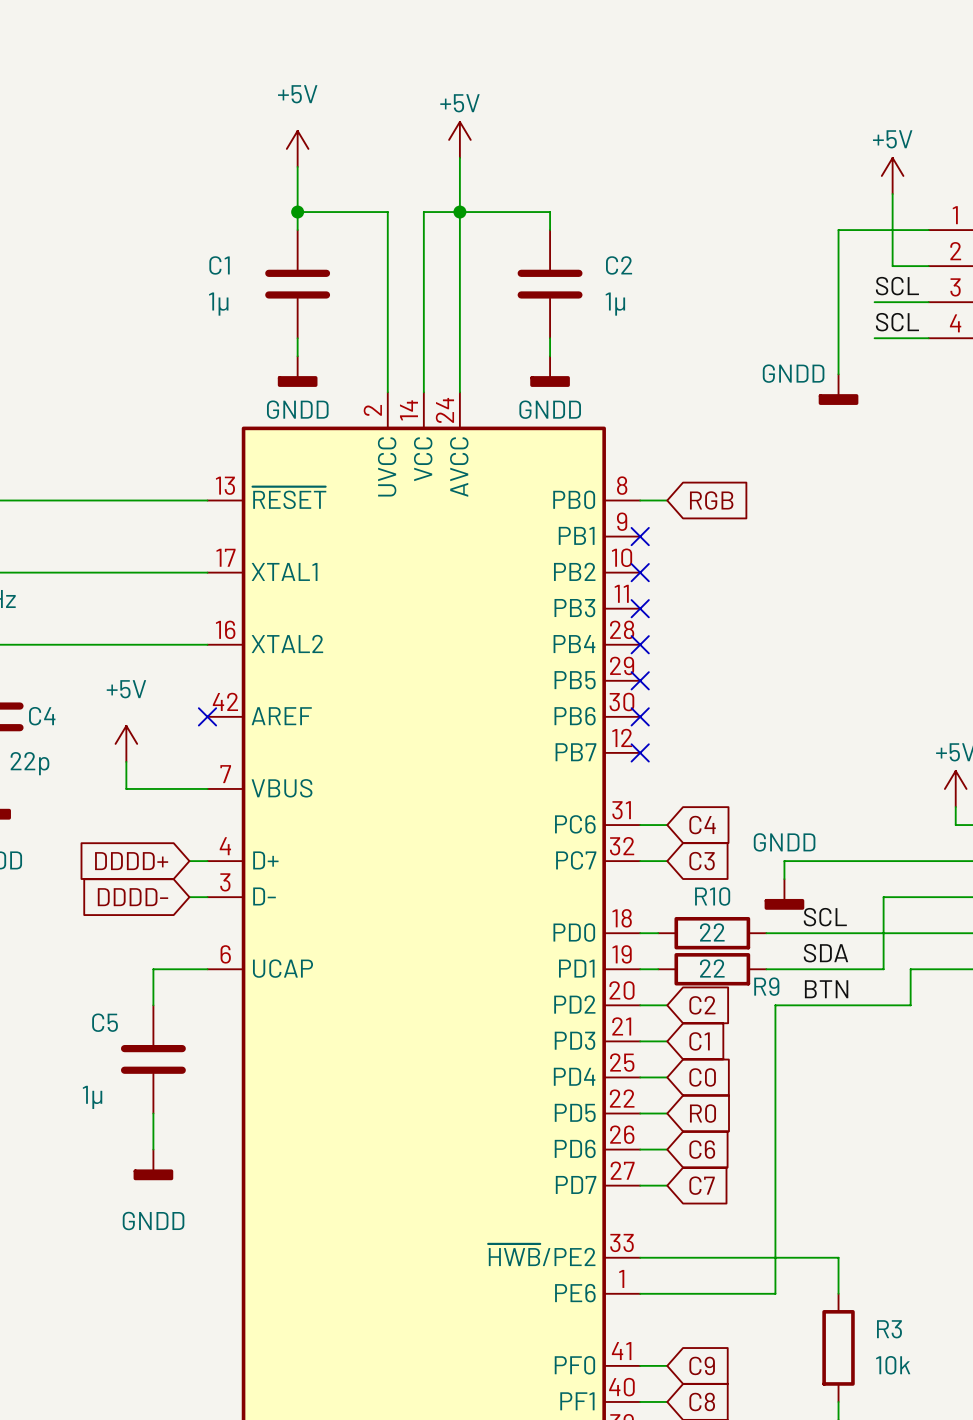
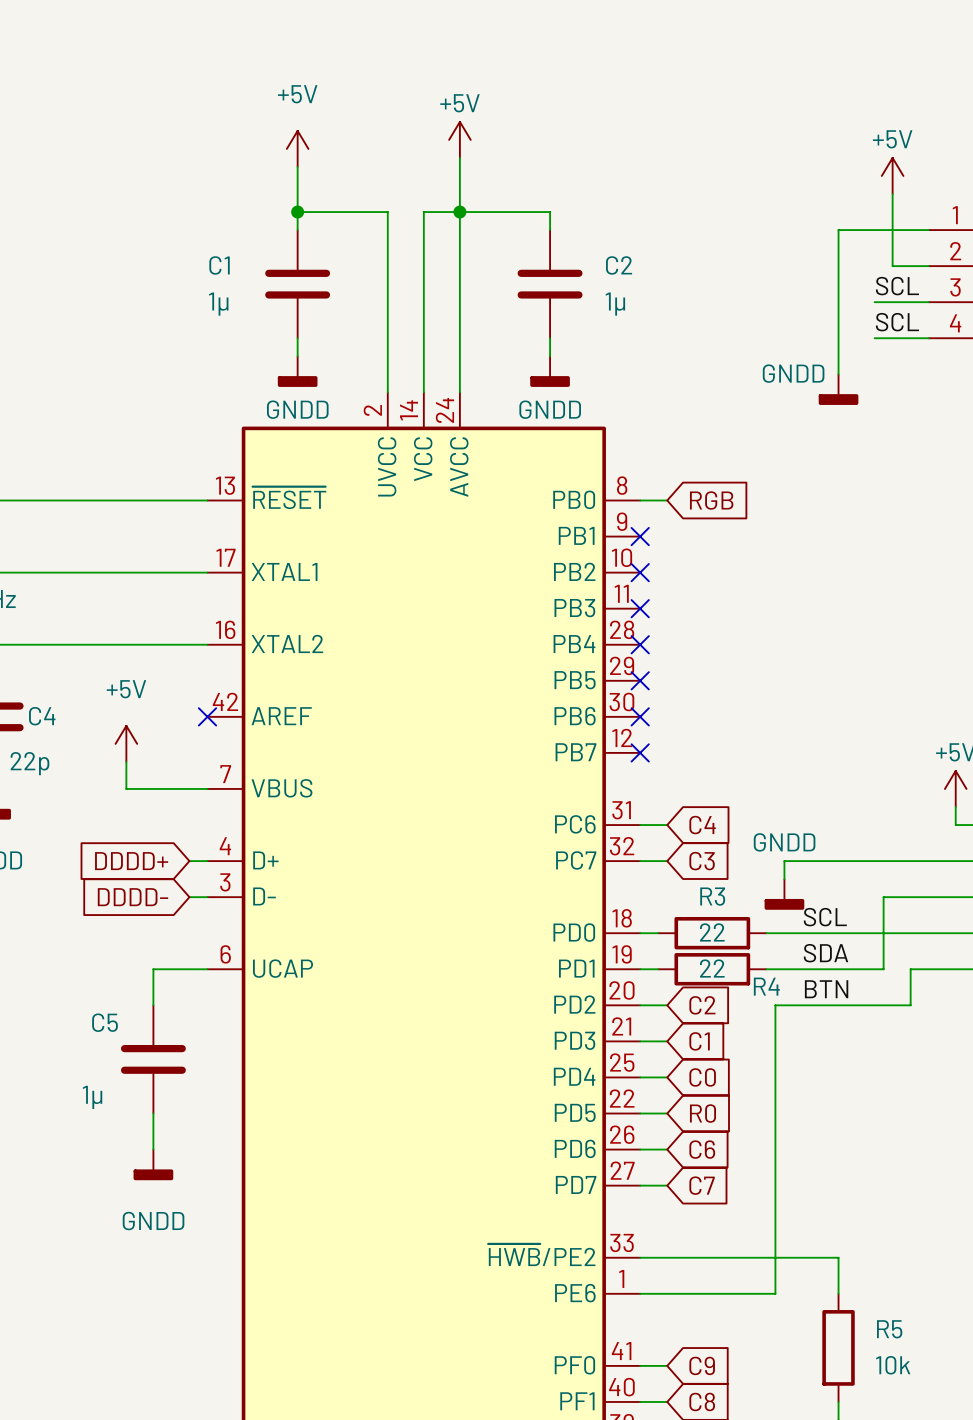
R10 name: R10 (712, 896) -> R3 (712, 896)
R9 name: R9 (766, 986) -> R4 (766, 986)
R3 name: R3 (889, 1329) -> R5 (889, 1329)

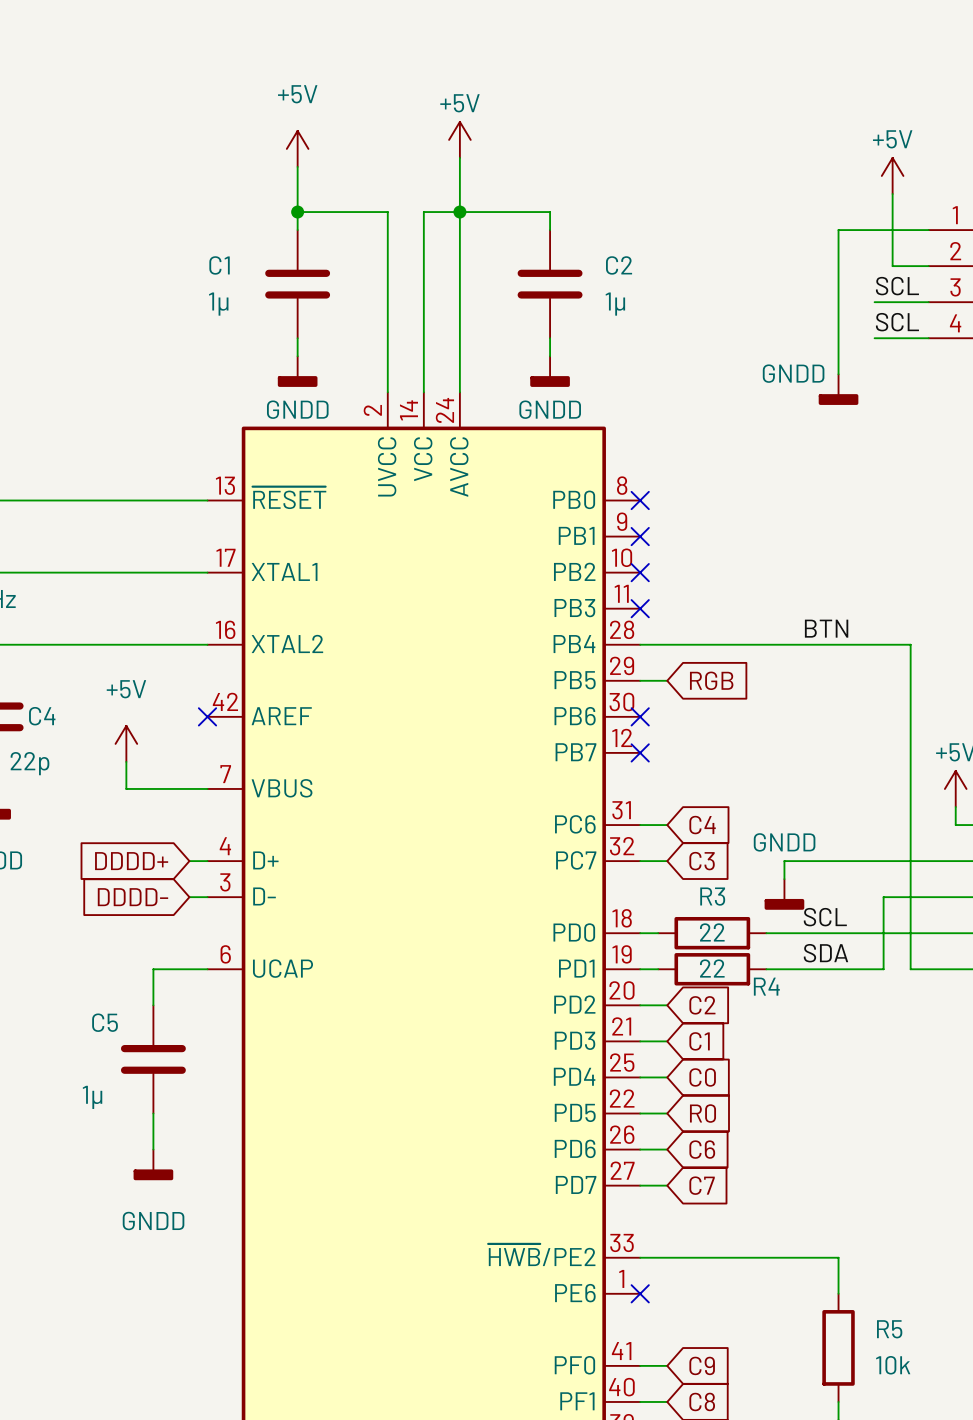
wire: (640, 500) (667, 500) -> (640, 680) (667, 680)
no-connect mark: none -> (640, 500)
global label position: RGB (711, 500) -> RGB (711, 680)
label: none -> BTN (826, 628)
no-connect mark: (640, 644) -> none
no-connect mark: (640, 680) -> none
wire: (910, 969) (910, 1005) (775, 1005) (775, 1293) (640, 1293) -> (910, 969) (910, 644) (640, 644)
label: BTN (826, 989) -> none
no-connect mark: none -> (640, 1293)

